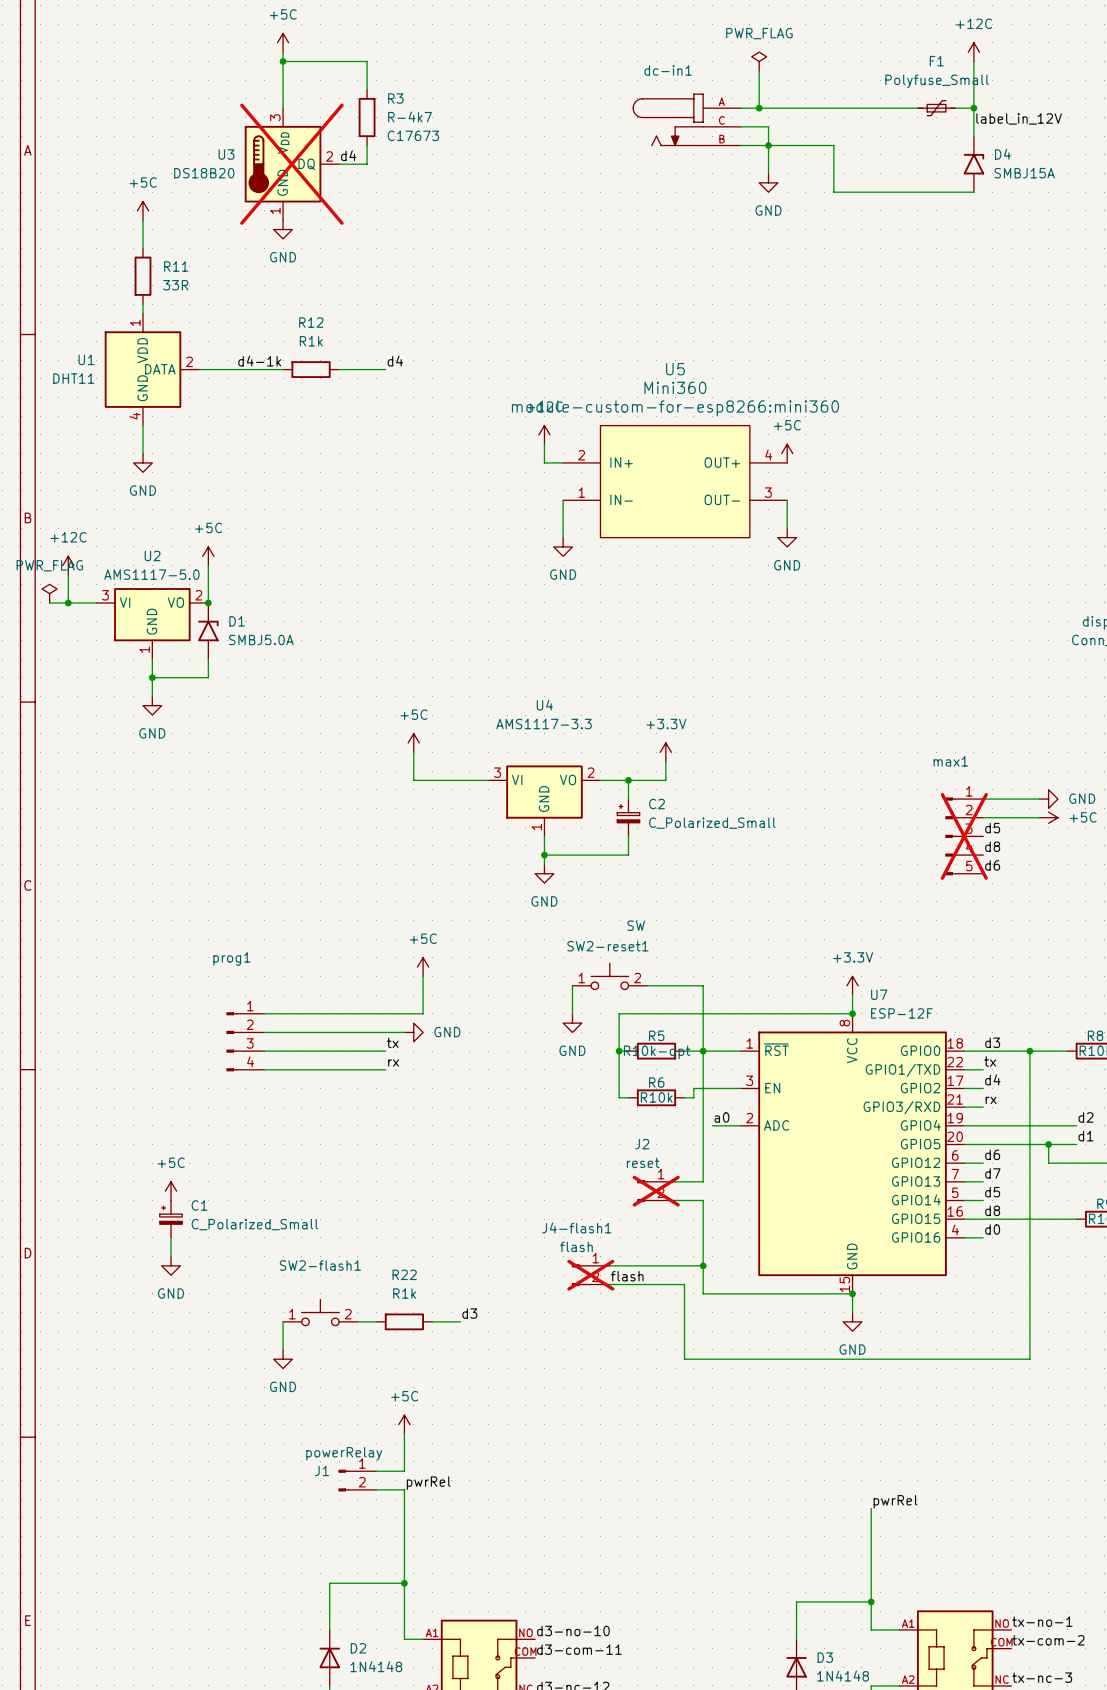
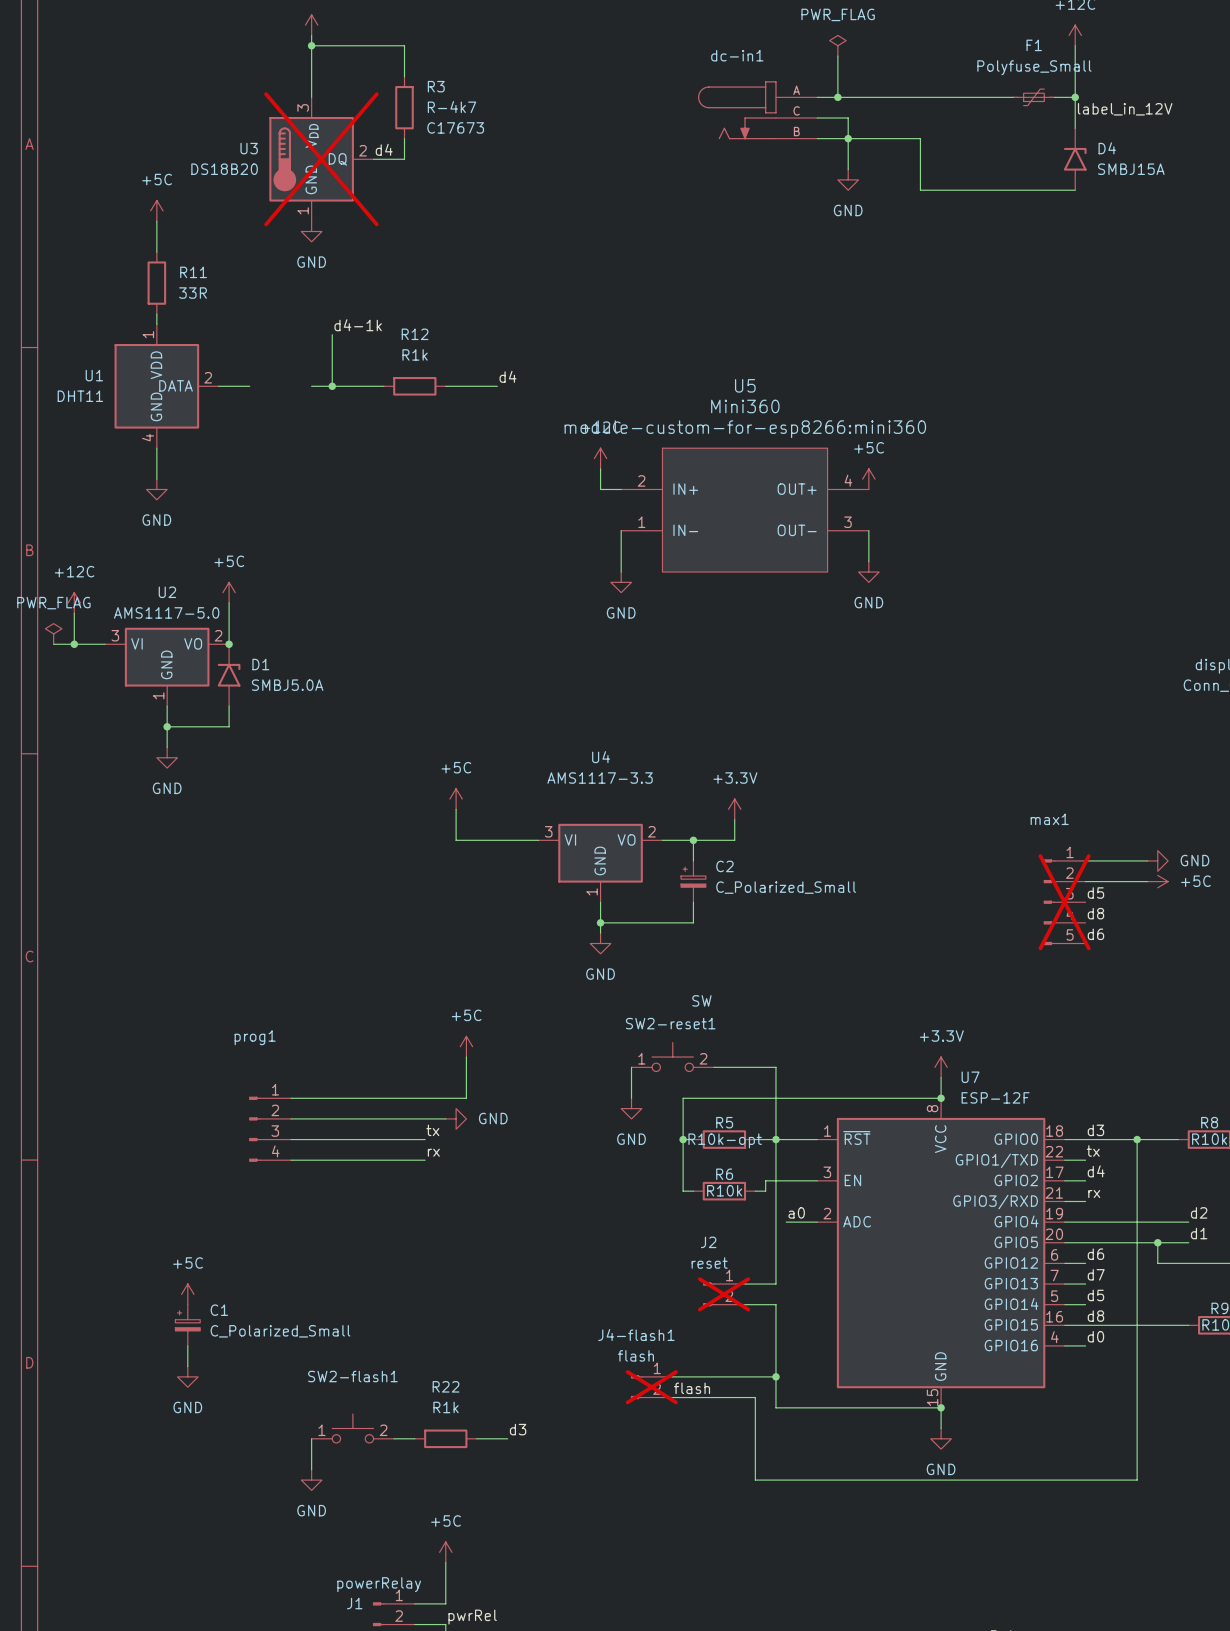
wire: none -> (332, 334) (332, 386)
label position: d4-1k (259, 361) -> d4-1k (358, 325)
label position: d4 (395, 361) -> d4 (508, 376)
wire: (227, 369) (283, 369) -> (373, 386) (311, 386)
junction: none -> (332, 386)
R12 position: (311, 369) -> (414, 386)
wire: (348, 369) (385, 369) -> none
wire: none -> (445, 386) (497, 386)

